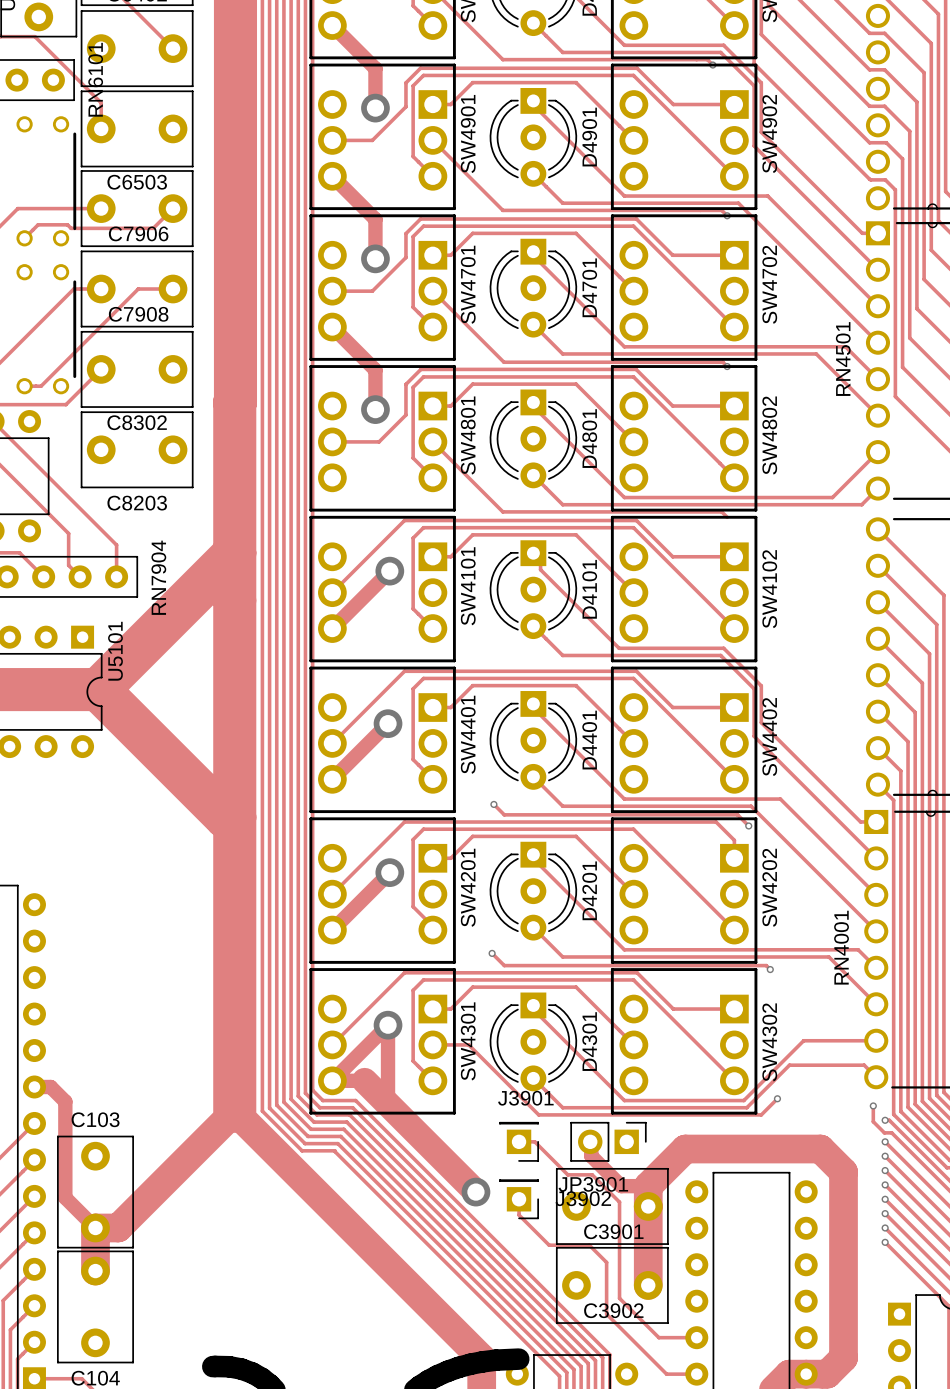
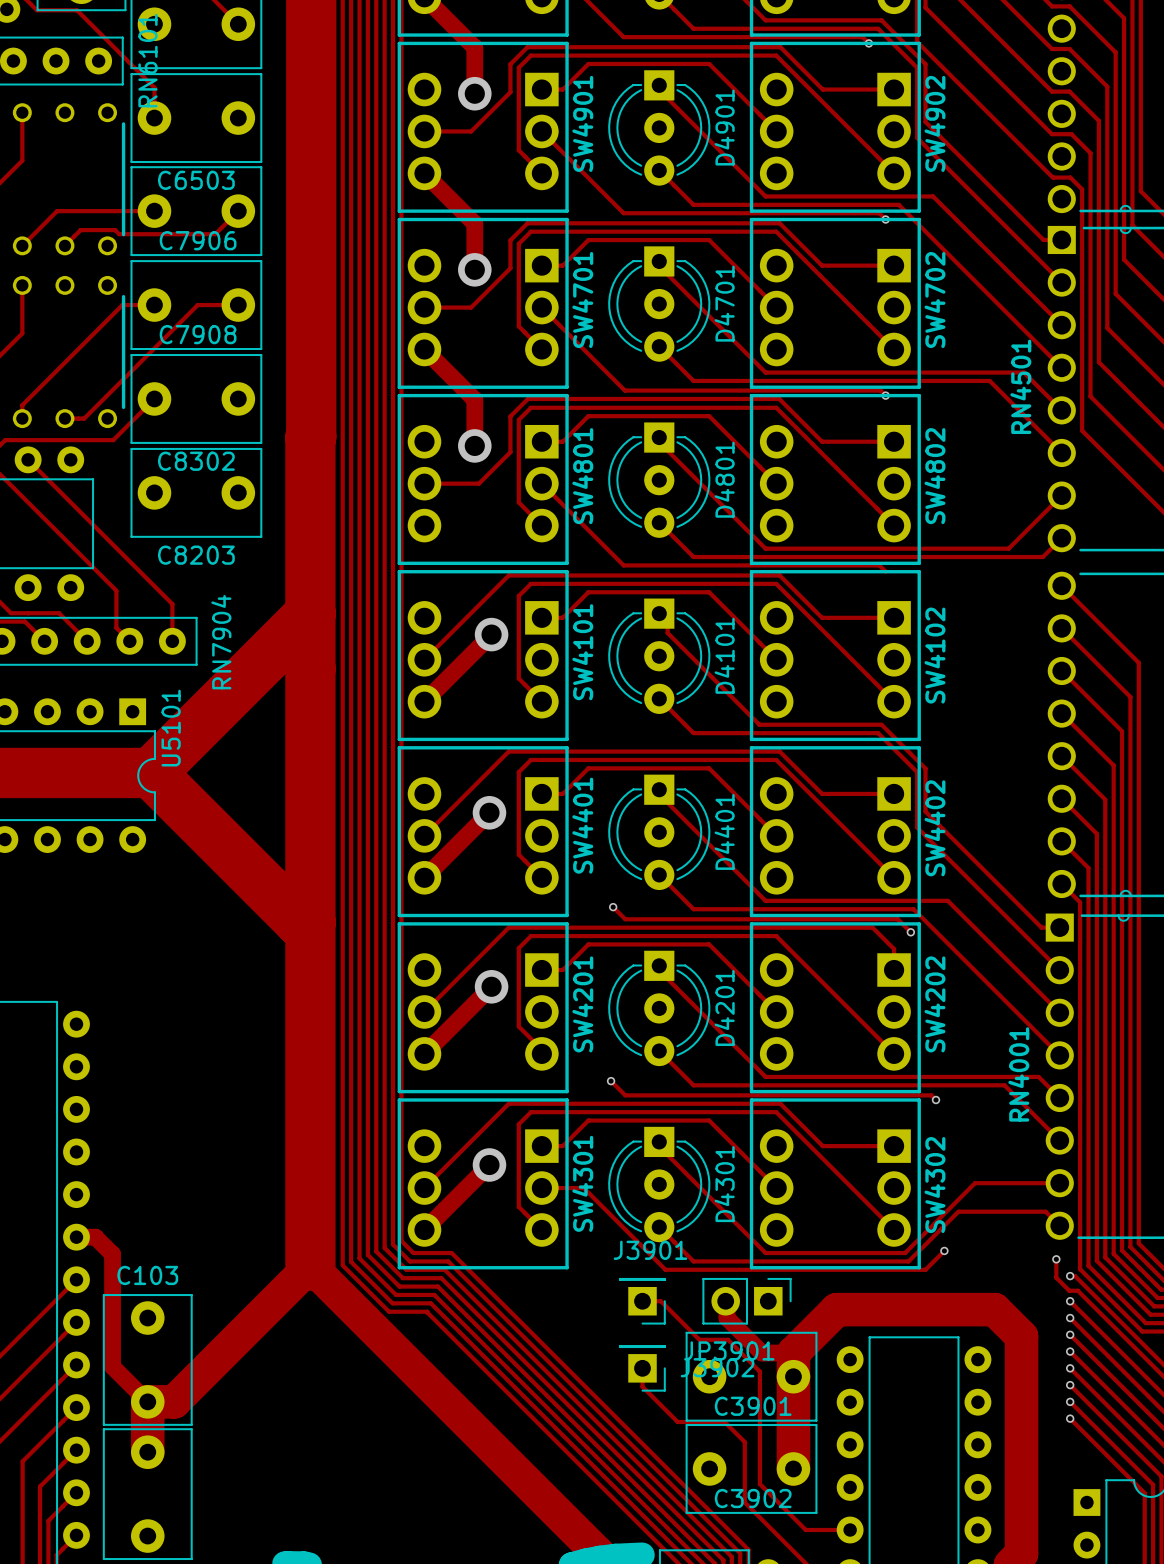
track: (388, 1025) (388, 1104) -> none
track: (332, 1080) (364, 1080) (475, 1192) -> none
via: (475, 1192) -> none

